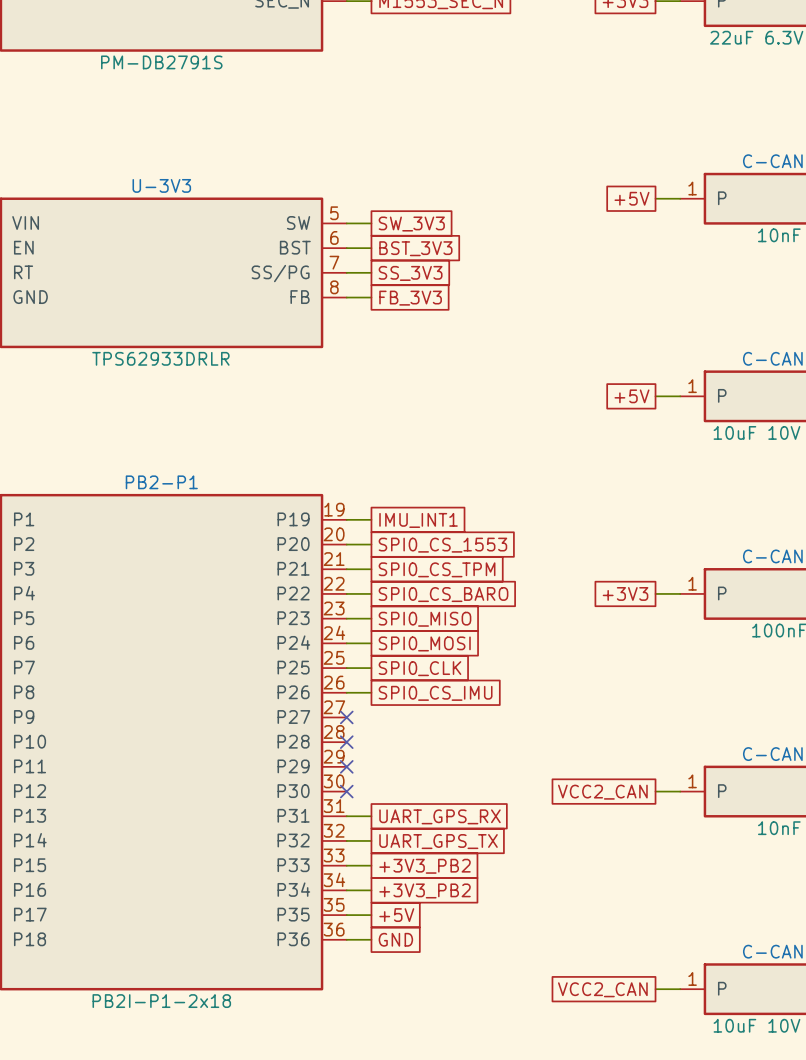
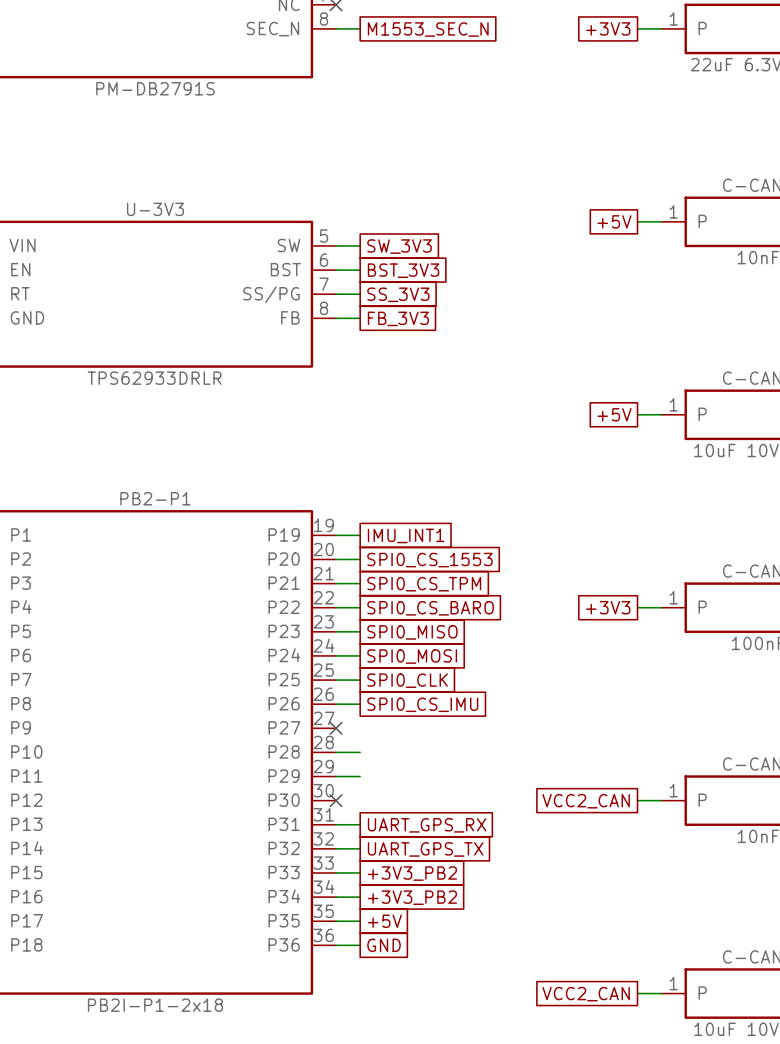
wire: none -> (336, 752) (360, 752)
no-connect mark: (346, 742) -> none
wire: none -> (336, 776) (360, 776)
no-connect mark: (346, 766) -> none

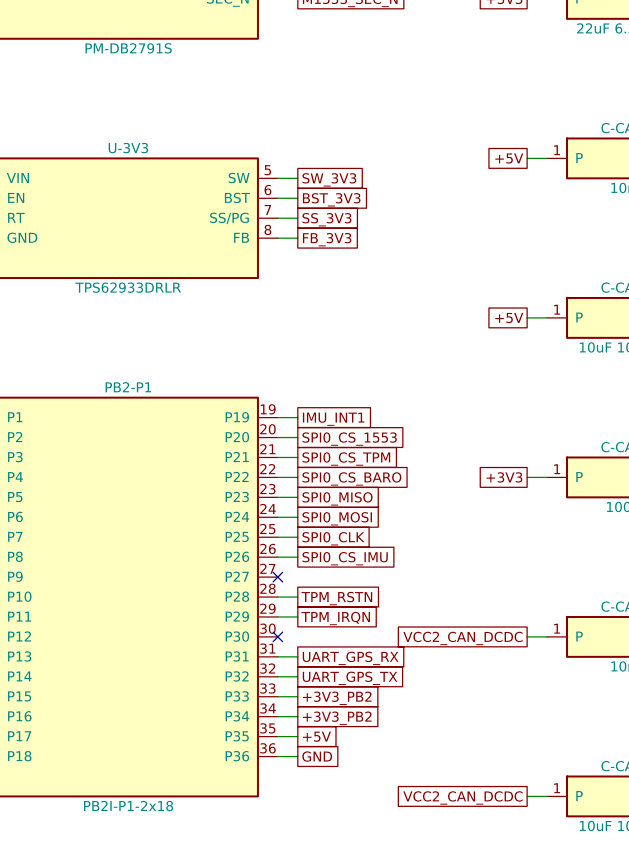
global label: none -> TPM_RSTN (336, 598)
global label: none -> TPM_IRQN (335, 618)
global label: VCC2_CAN (586, 801) -> VCC2_CAN_DCDC (463, 638)
global label: VCC2_CAN (586, 994) -> VCC2_CAN_DCDC (463, 797)

